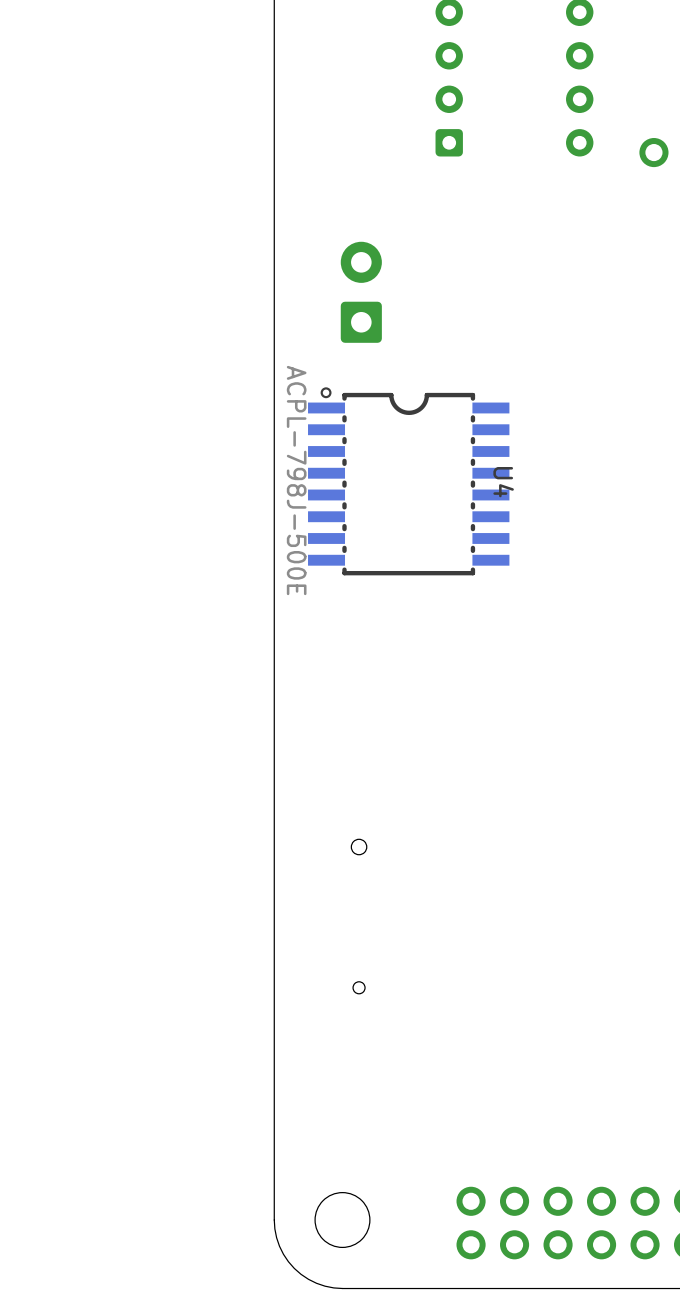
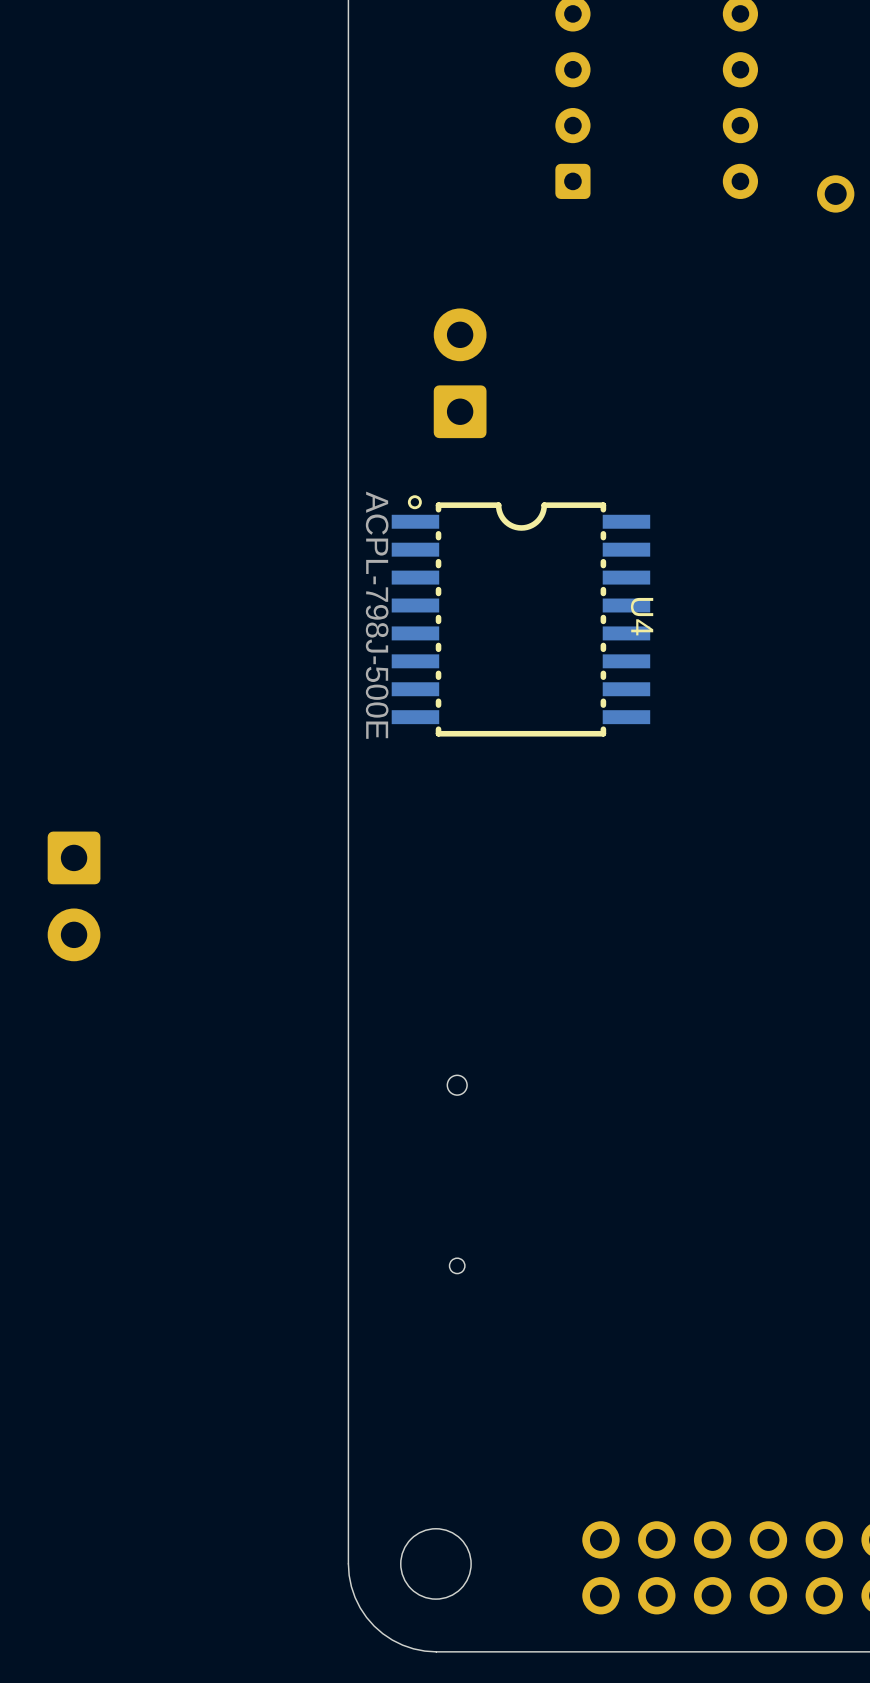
part: none -> (74, 896)

